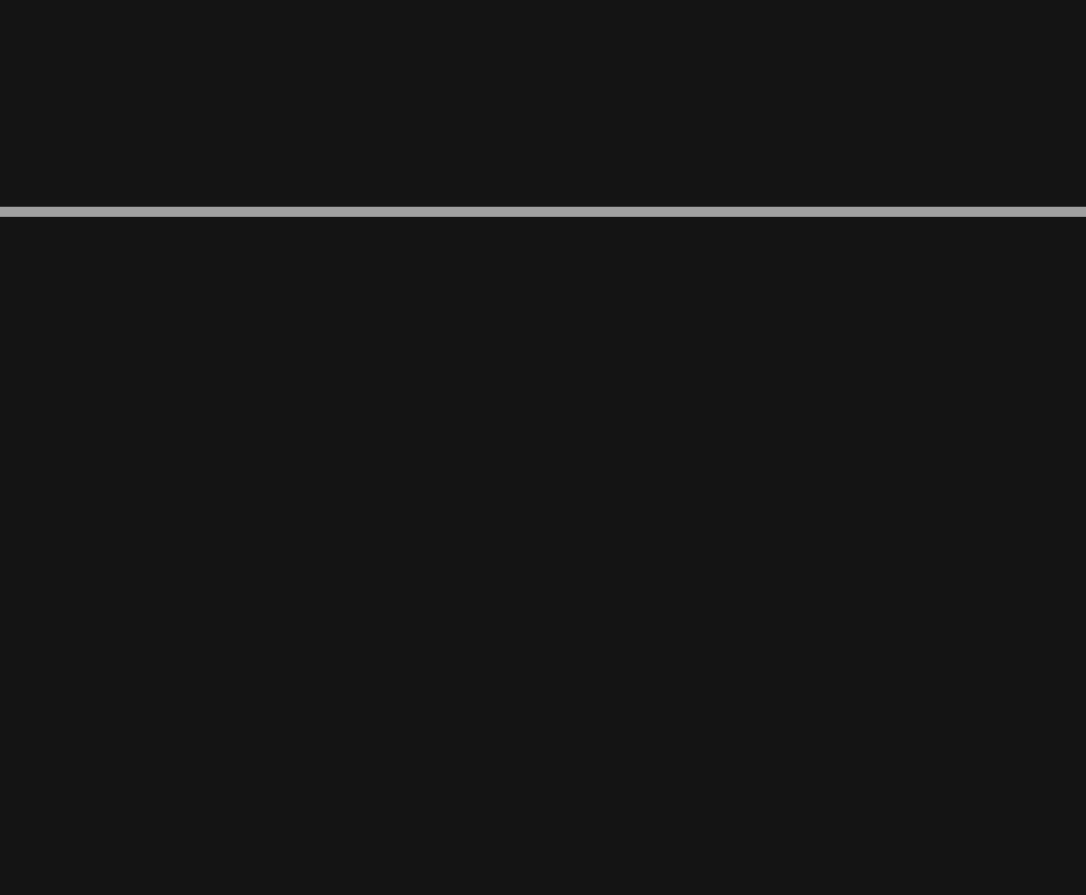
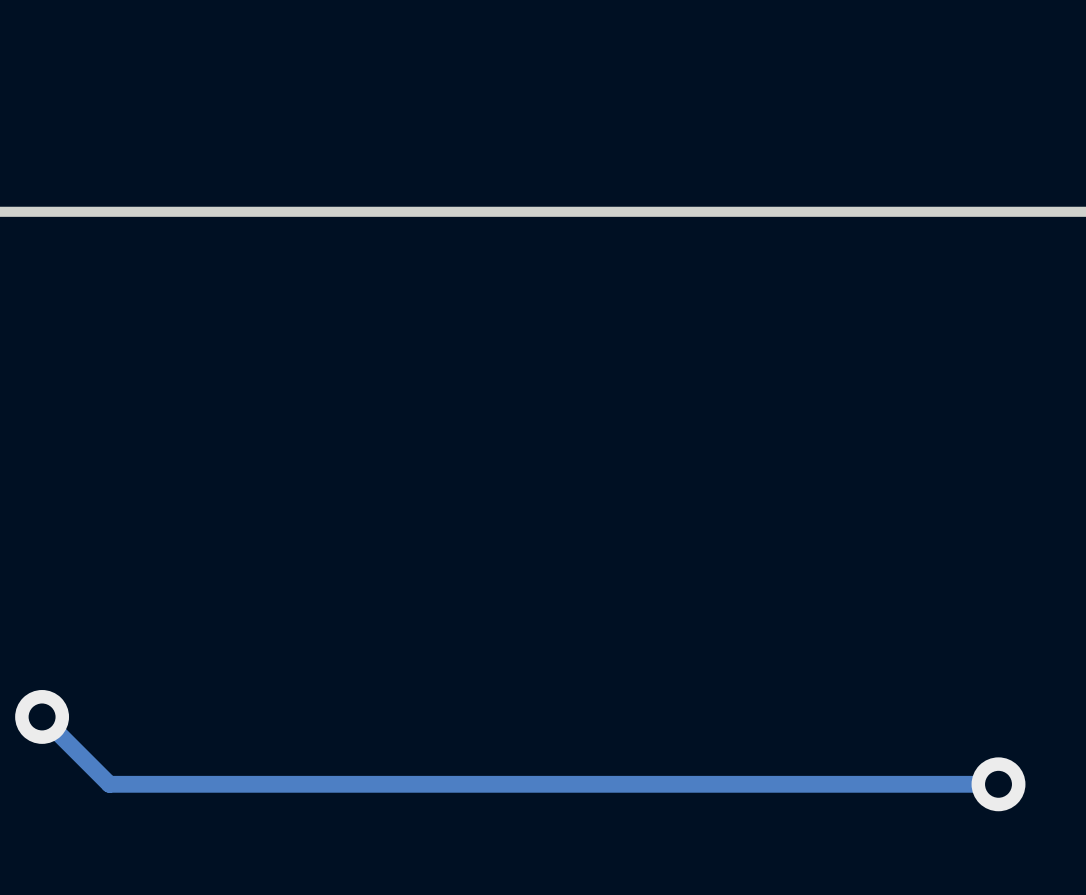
track: none -> (42, 716) (109, 784) (998, 784)
via: none -> (42, 716)
via: none -> (998, 784)

